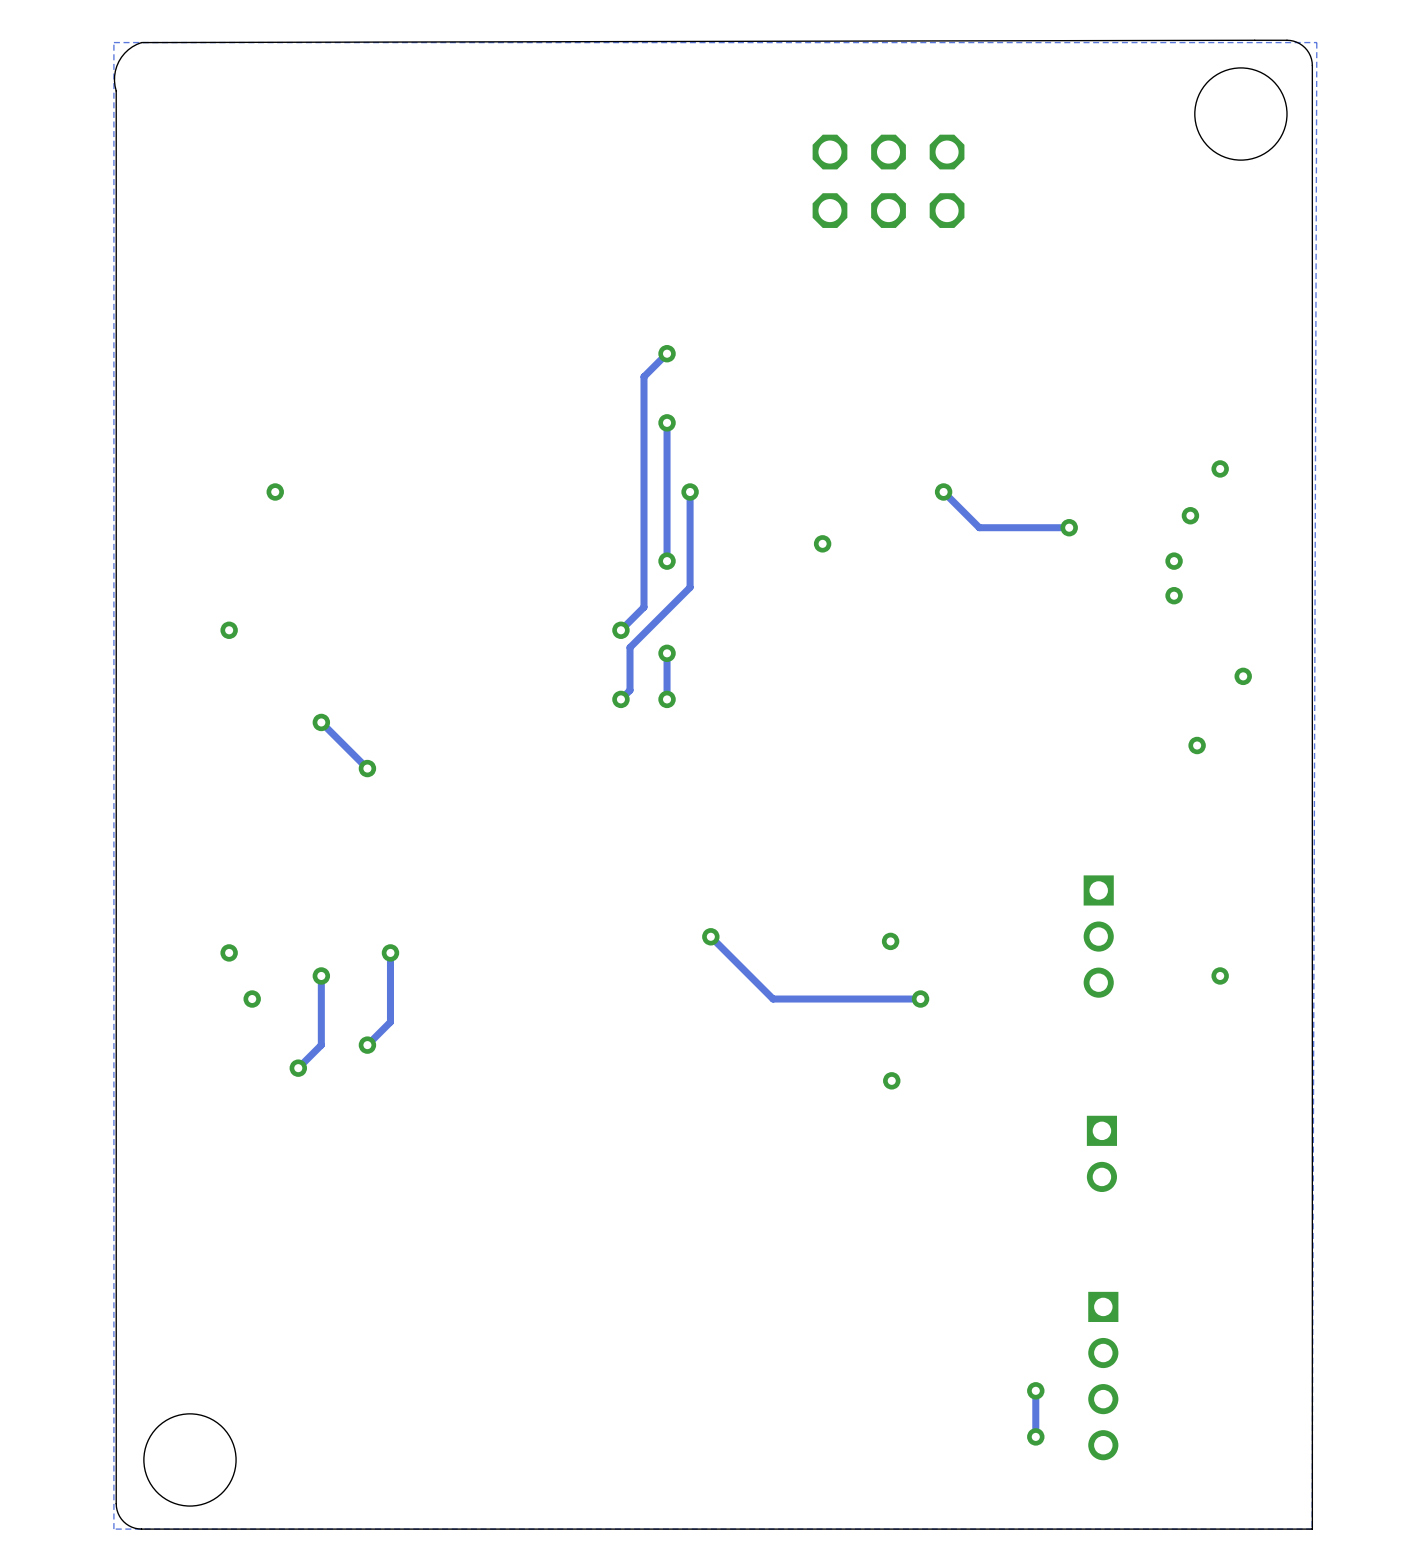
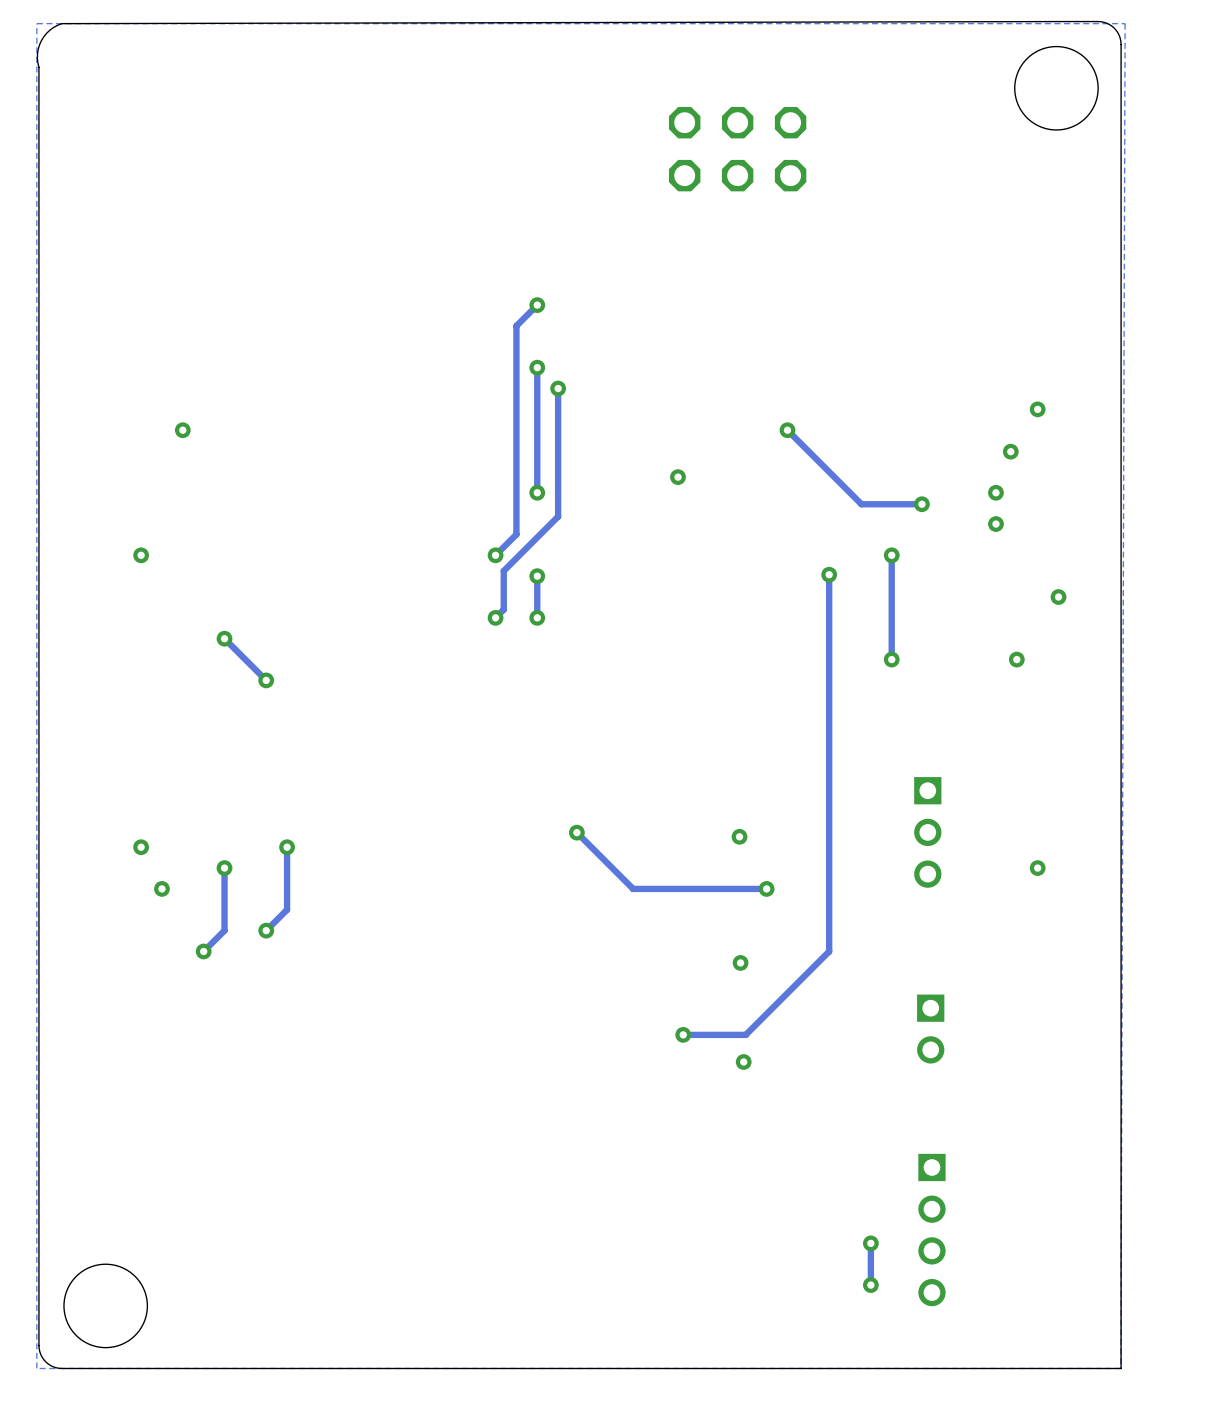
track: none -> (558, 388) (558, 430)
via position: (690, 491) -> (558, 388)
track: (1069, 527) (979, 527) -> (921, 504) (861, 504) (819, 462)
via: (1069, 527) -> none
via: none -> (921, 504)
track: none -> (891, 555) (891, 659)
via: none -> (891, 555)
track: none -> (829, 574) (829, 951) (745, 1034) (683, 1034)
via: none -> (829, 574)
via: none -> (891, 659)
via: none -> (683, 1034)
via: none -> (743, 1061)

